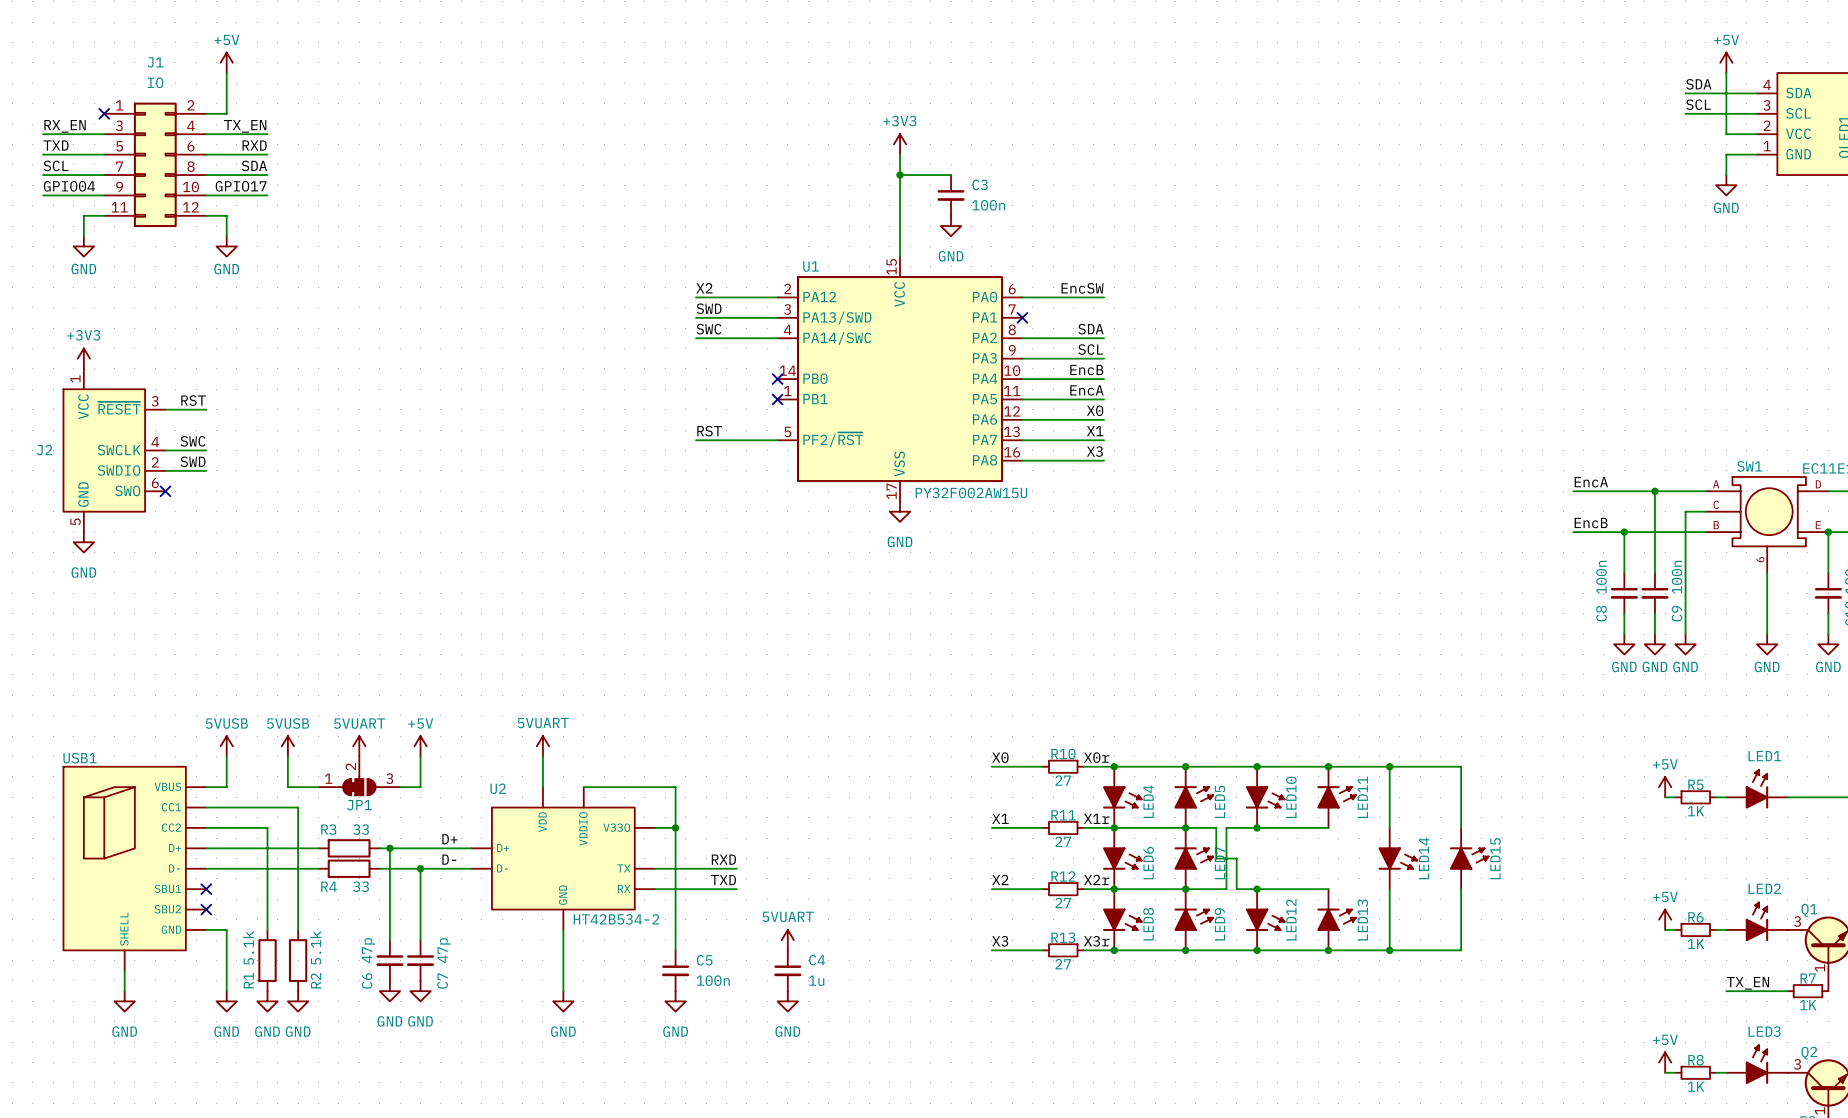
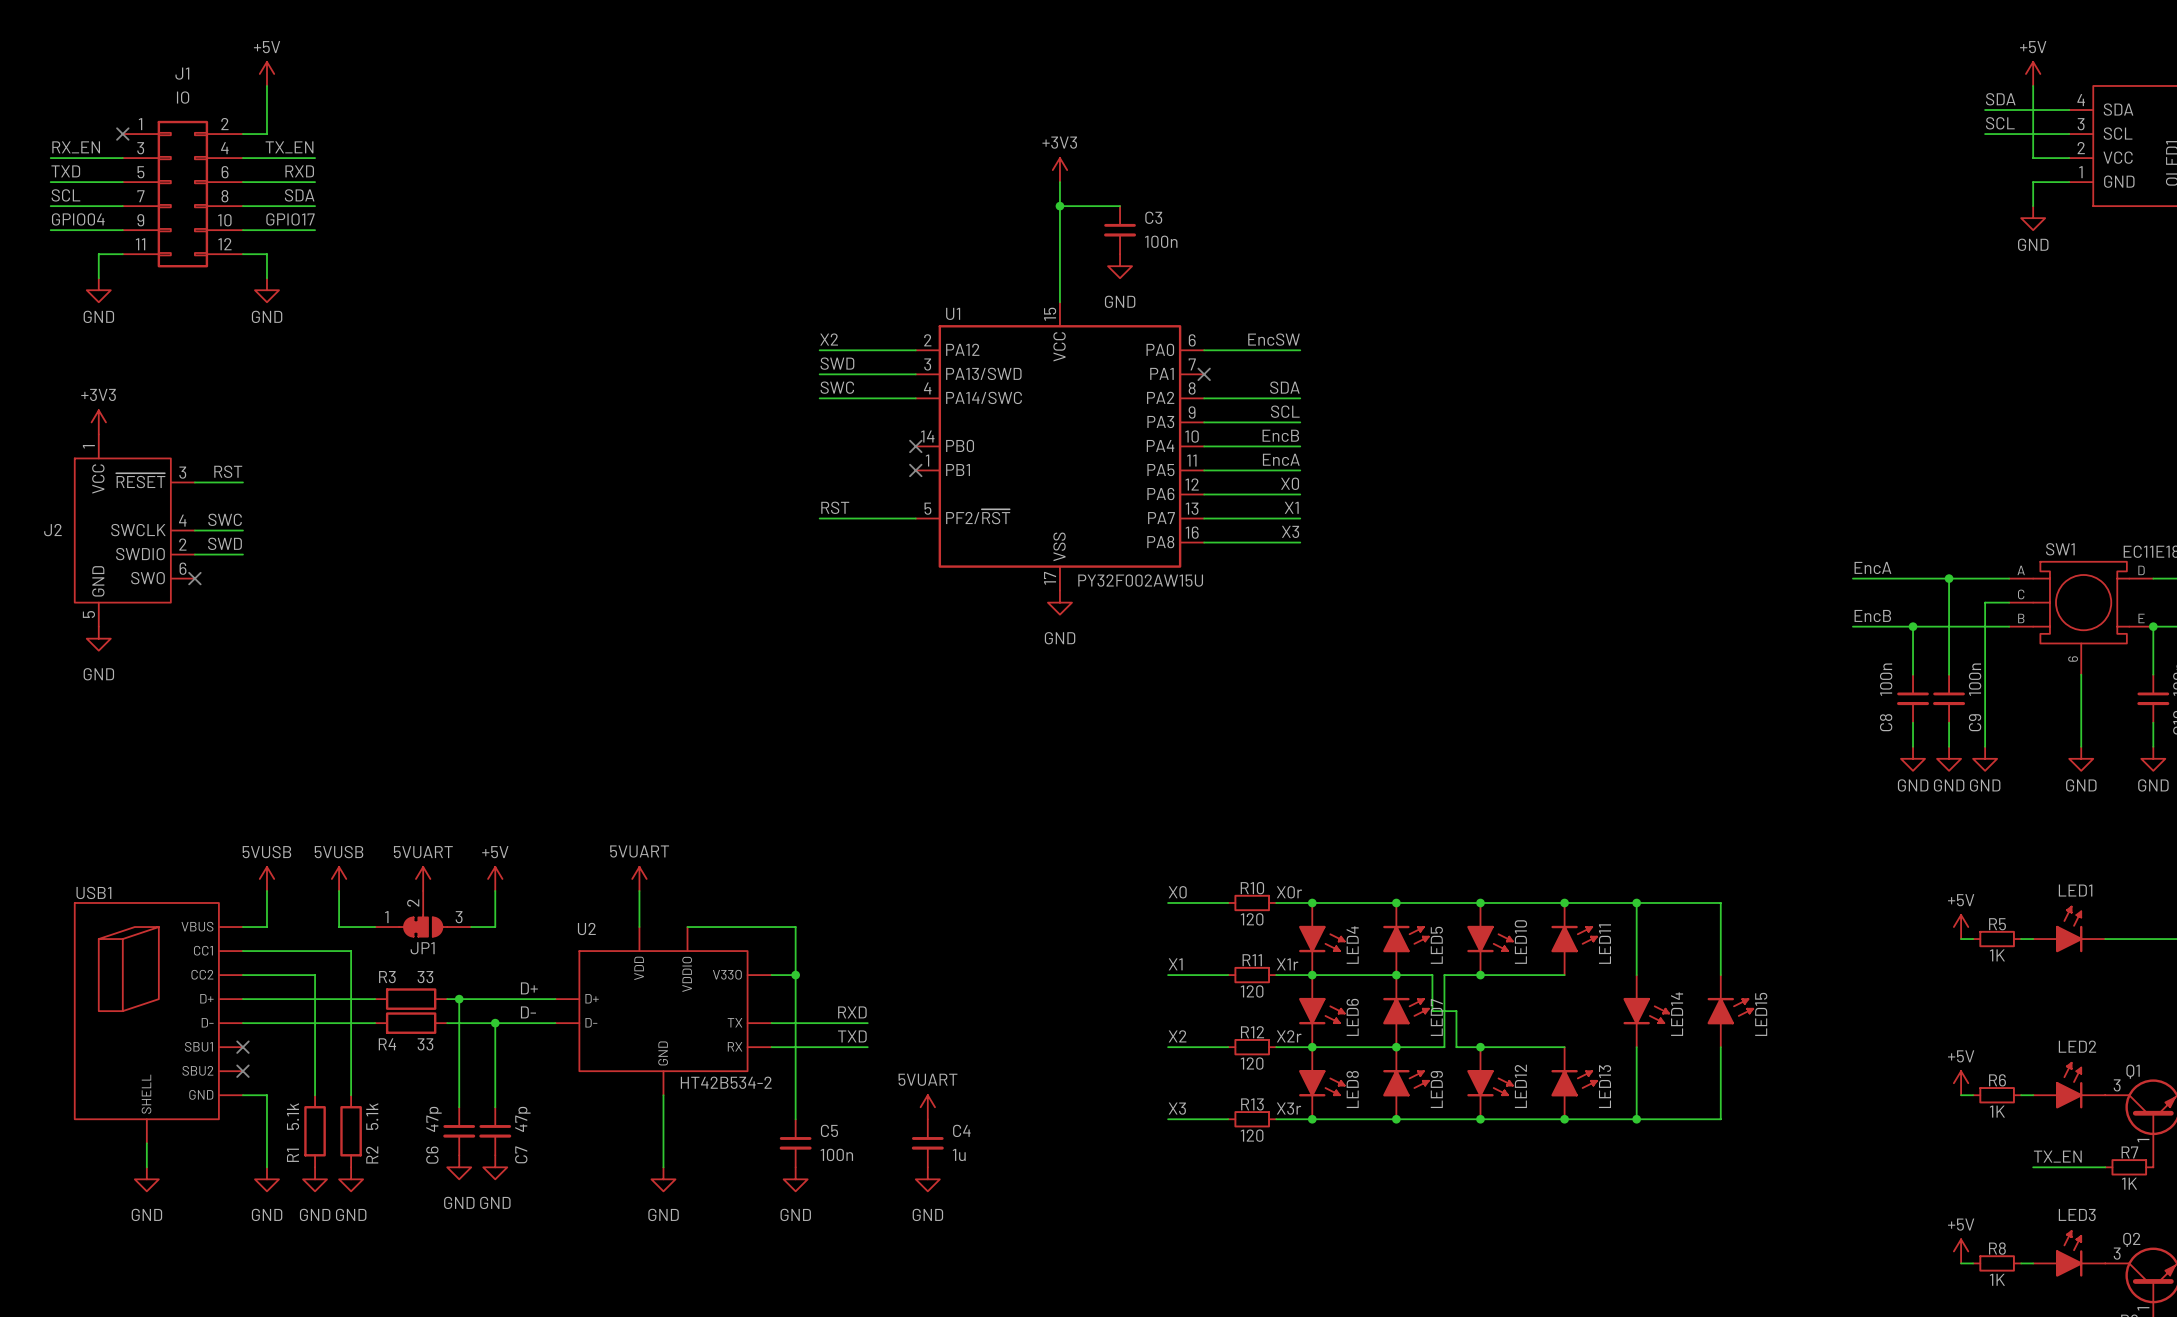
R10 value: 27 (1063, 780) -> 120 (1252, 919)
R11 value: 27 (1063, 841) -> 120 (1252, 991)
R12 value: 27 (1063, 902) -> 120 (1252, 1063)
R13 value: 27 (1063, 964) -> 120 (1252, 1135)

